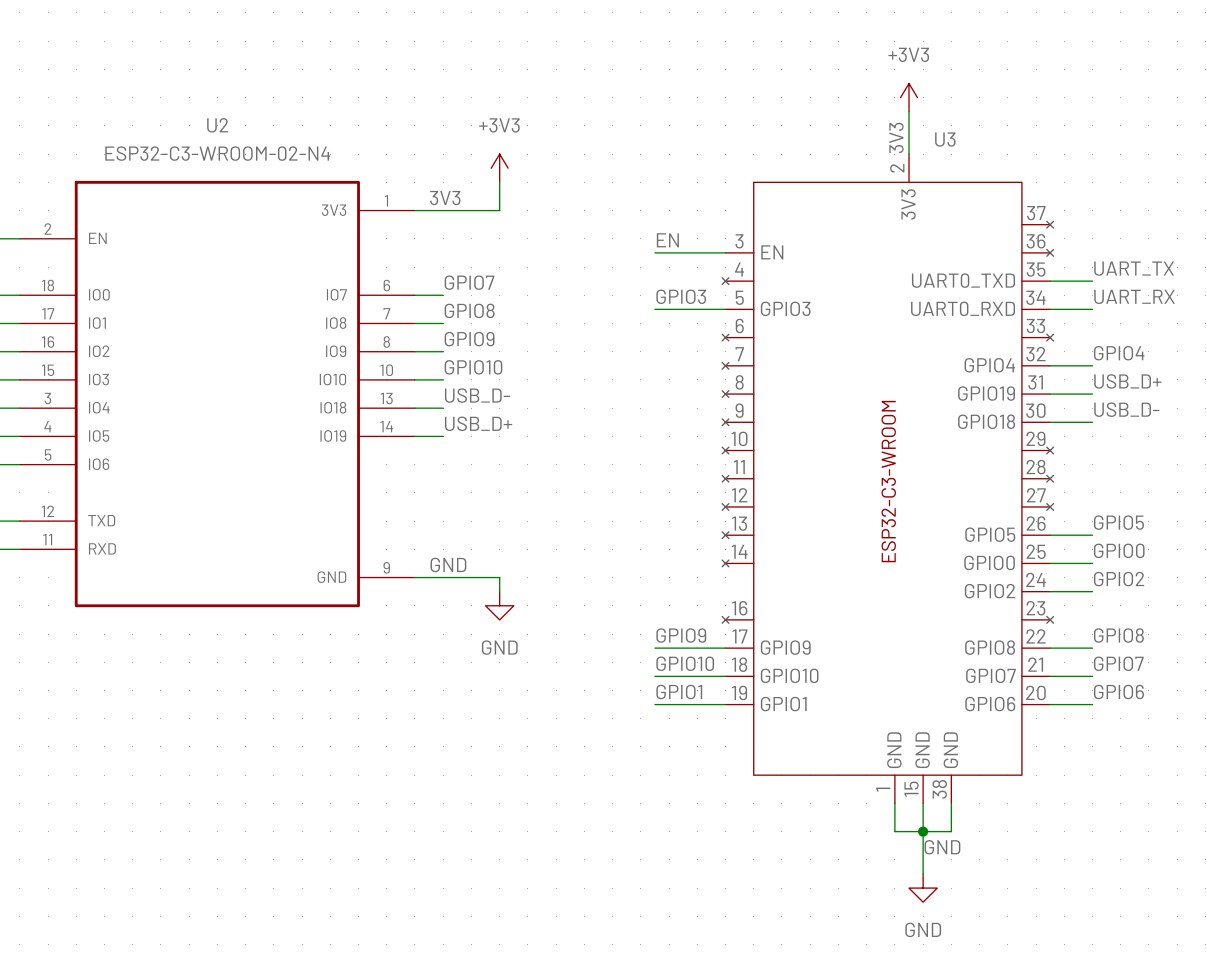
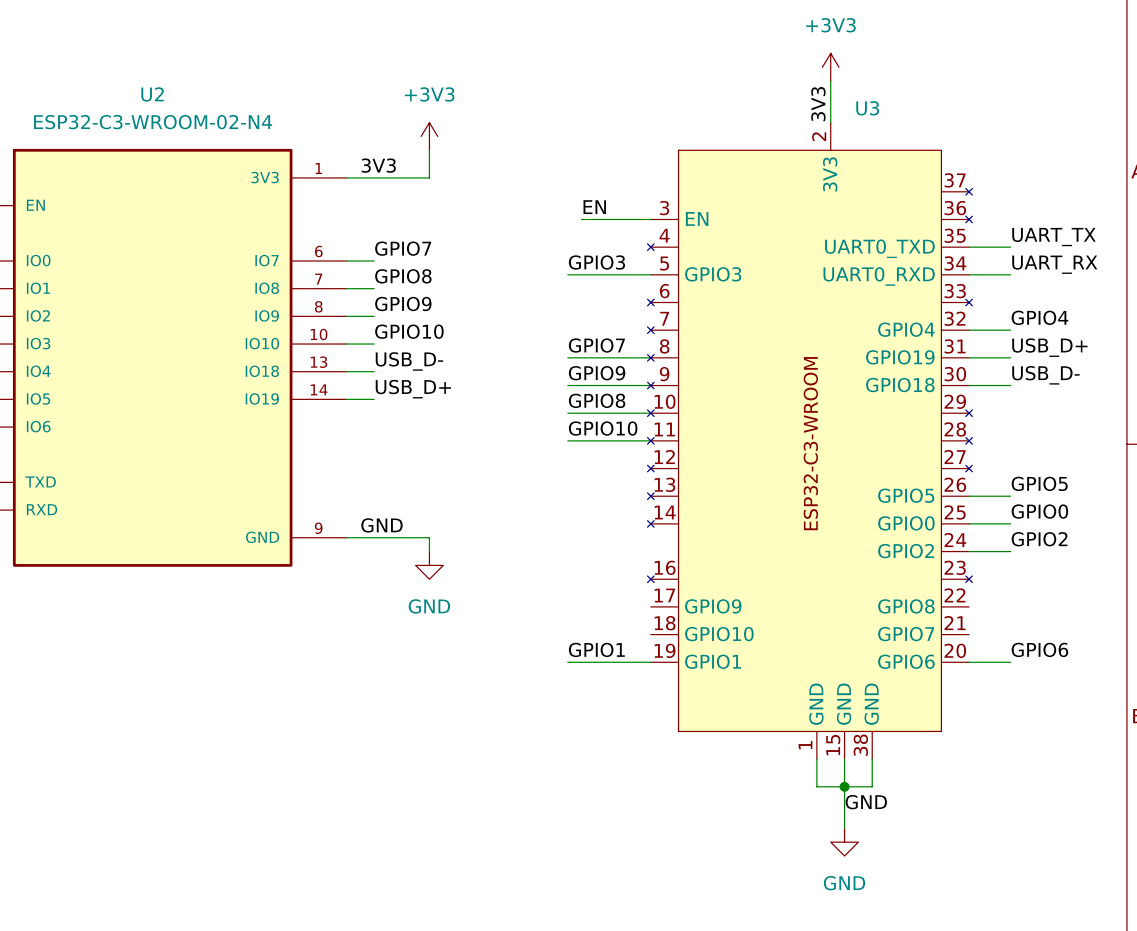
label position: GPIO3 (681, 296) -> GPIO3 (596, 262)
wire: none -> (567, 274) (581, 274)
label: none -> GPIO7 (596, 345)
wire: none -> (567, 357) (650, 357)
wire: none -> (567, 385) (650, 385)
label: none -> GPIO8 (597, 400)
wire: none -> (567, 413) (650, 413)
wire: none -> (567, 440) (650, 440)
label position: GPIO9 (681, 635) -> GPIO9 (597, 373)
label: GPIO8 (1118, 635) -> none
wire: (654, 648) (725, 648) -> none
wire: (1050, 648) (1092, 648) -> none
label position: GPIO10 (685, 663) -> GPIO10 (603, 428)
label: GPIO7 (1118, 663) -> none
wire: (654, 676) (725, 676) -> none
wire: (1050, 676) (1092, 676) -> none
label position: GPIO1 (679, 691) -> GPIO1 (596, 649)
wire: none -> (567, 662) (581, 662)

